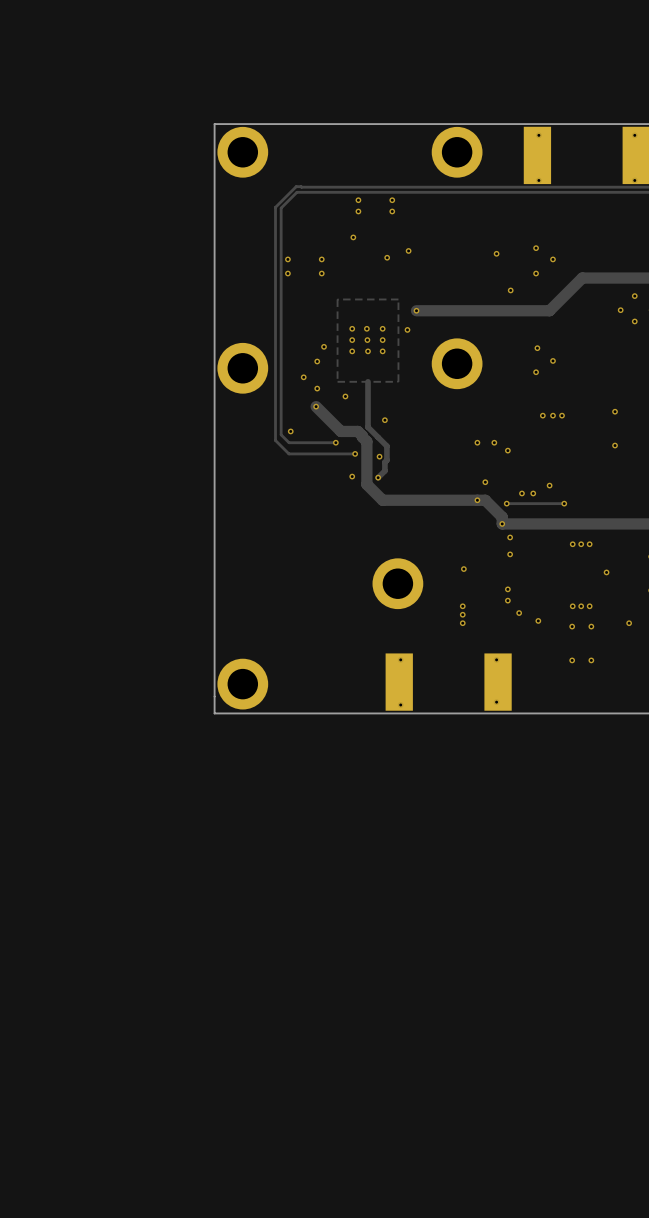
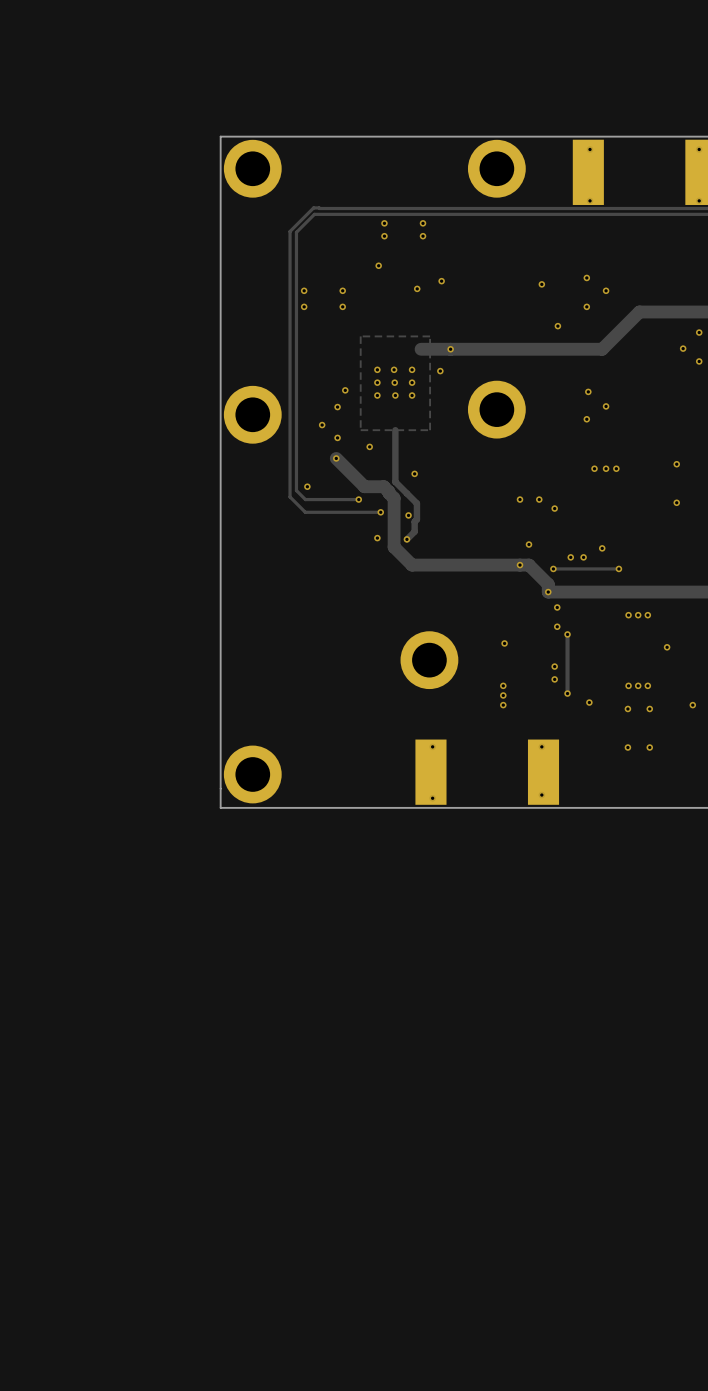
track: none -> (450, 349) (421, 349)
track: none -> (567, 634) (567, 693)
via: none -> (567, 634)

